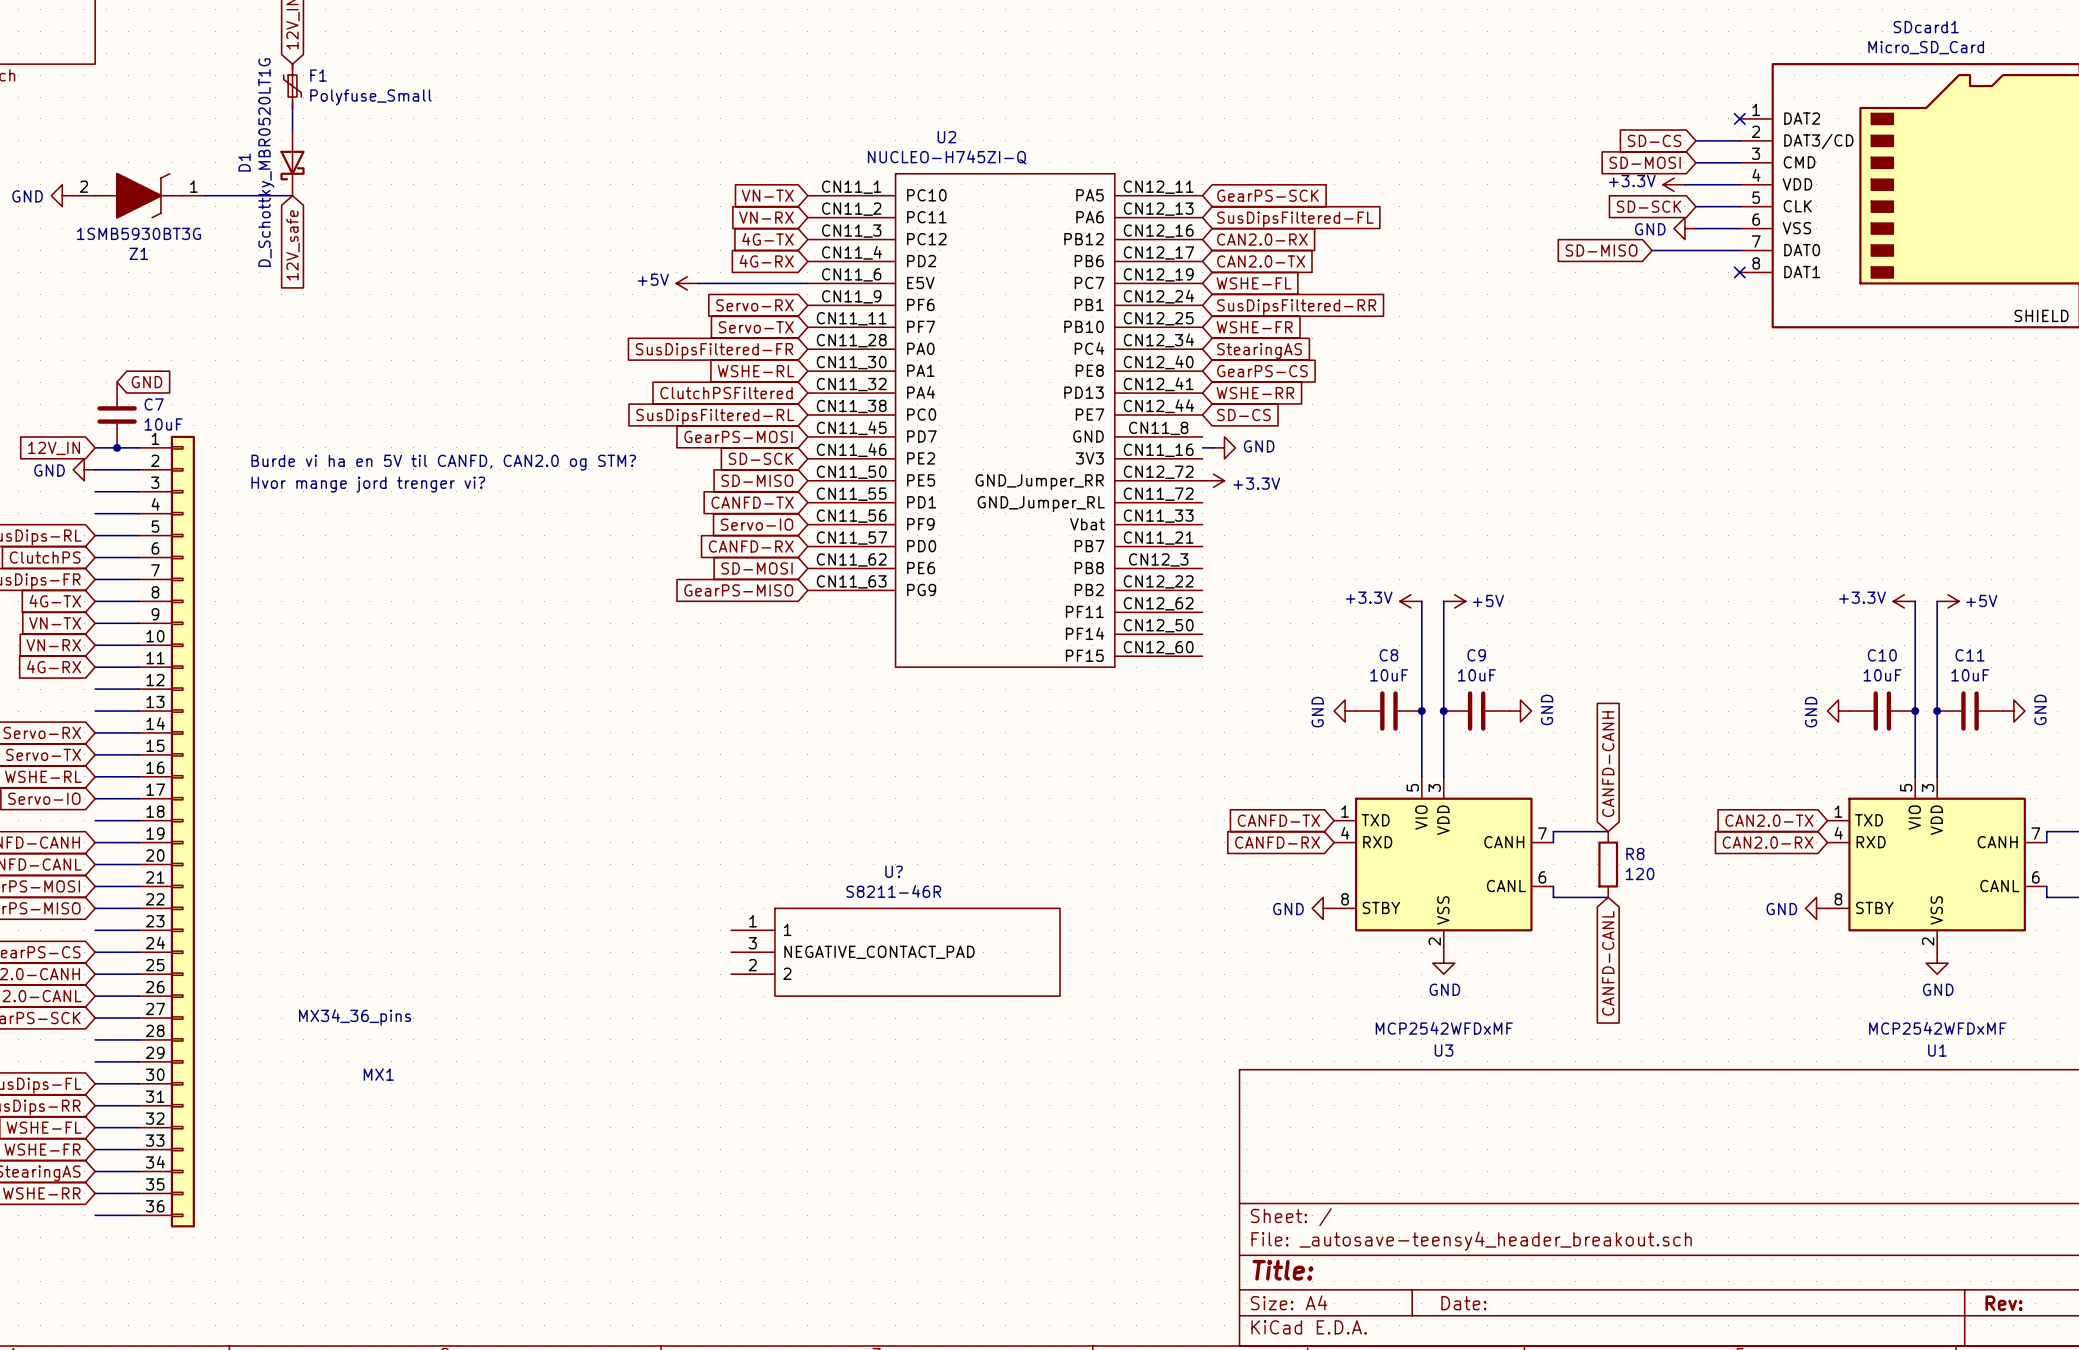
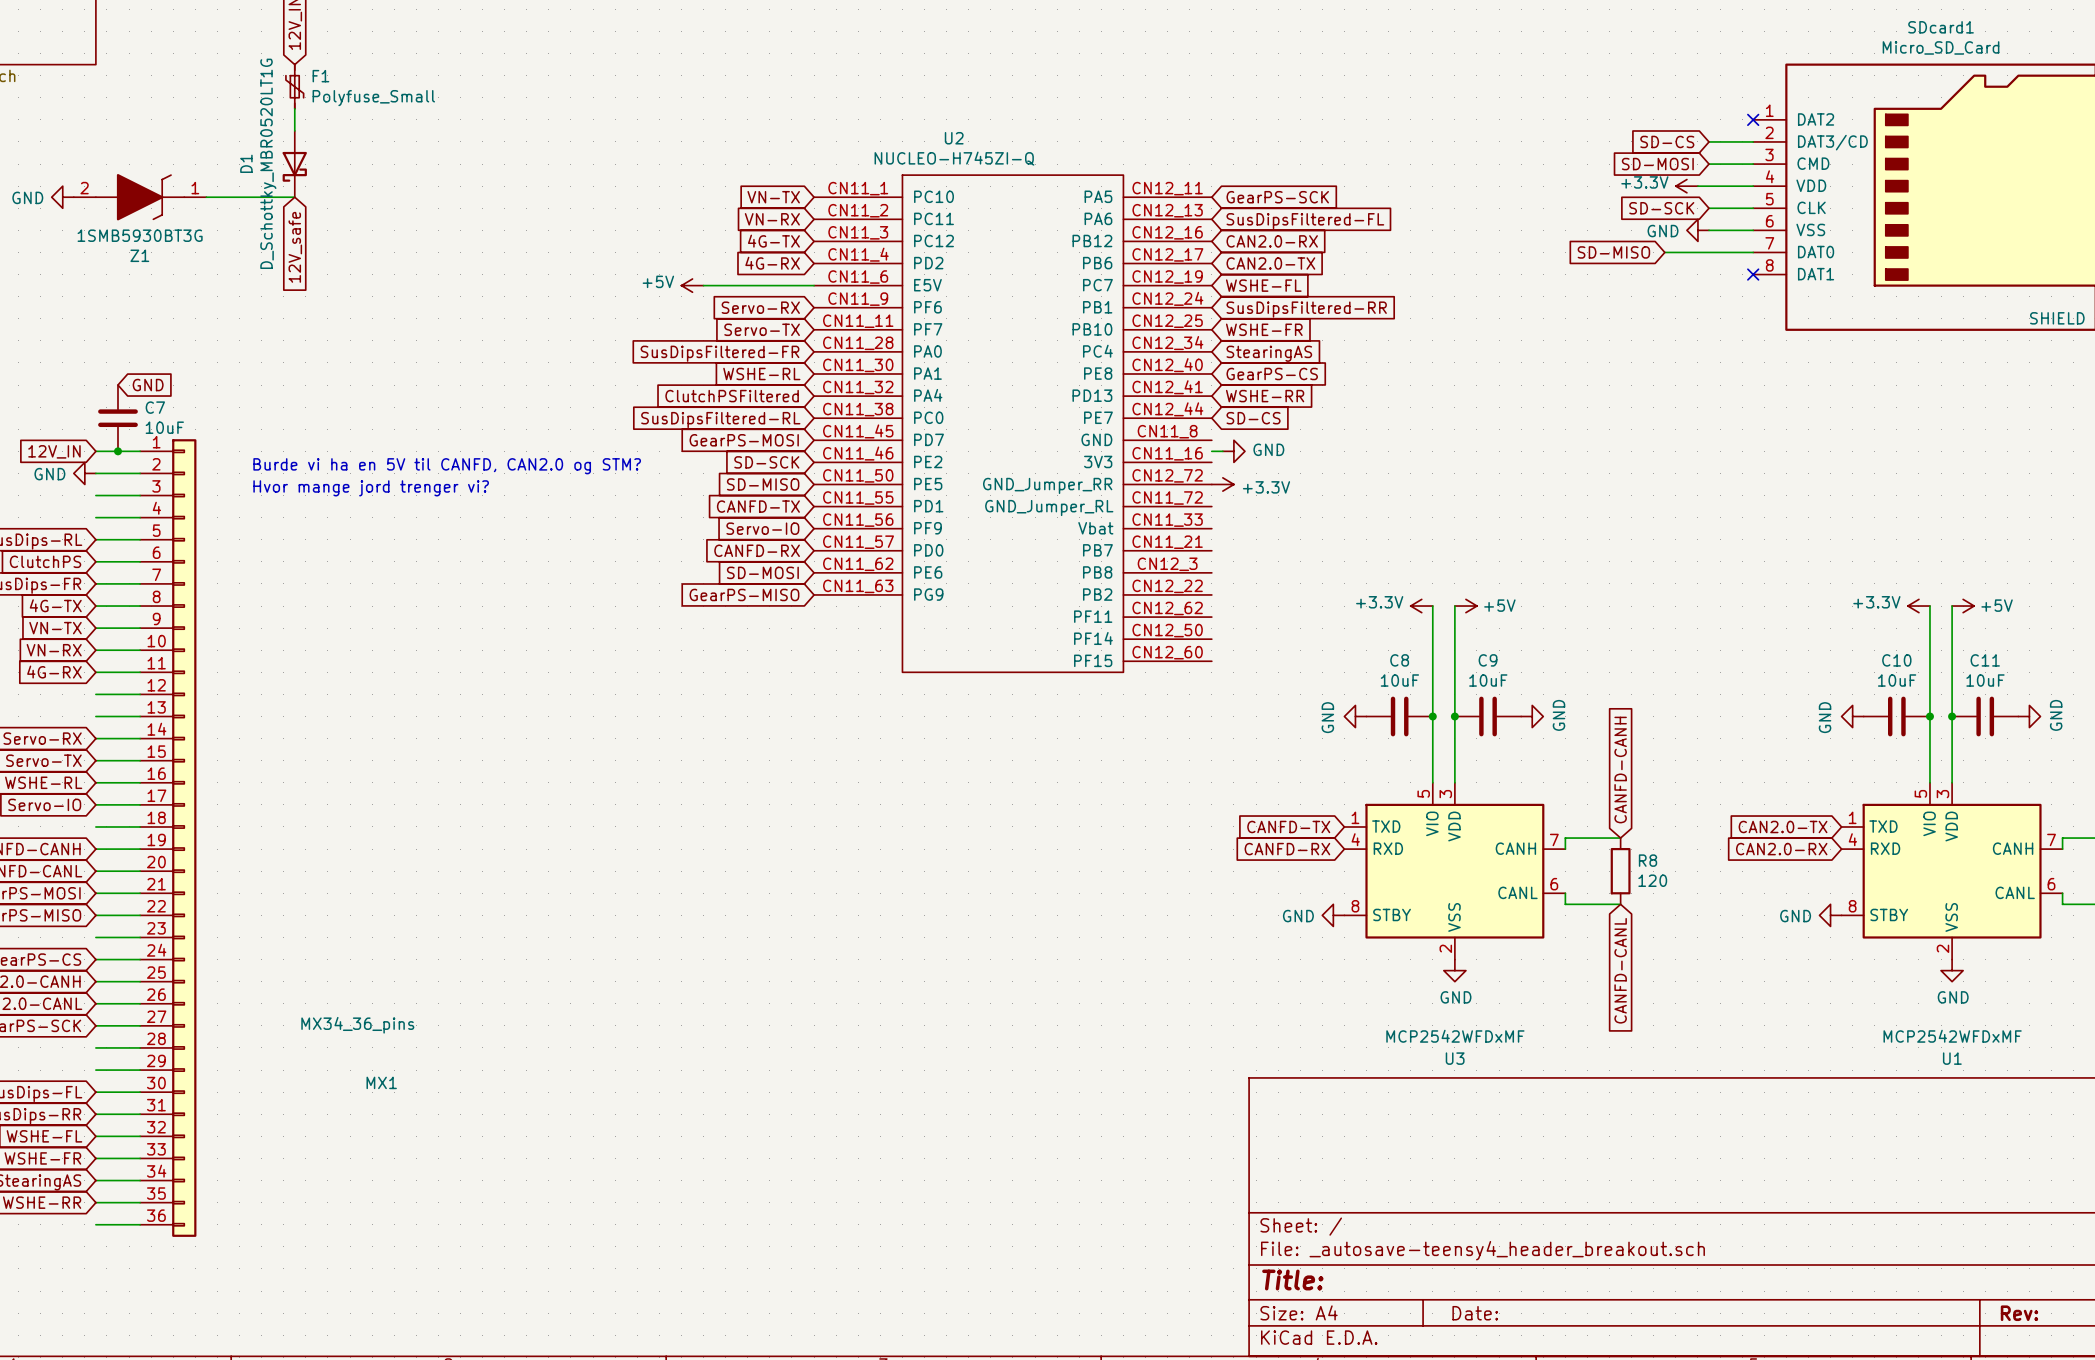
U?: S8211-46R (895, 952) -> none

